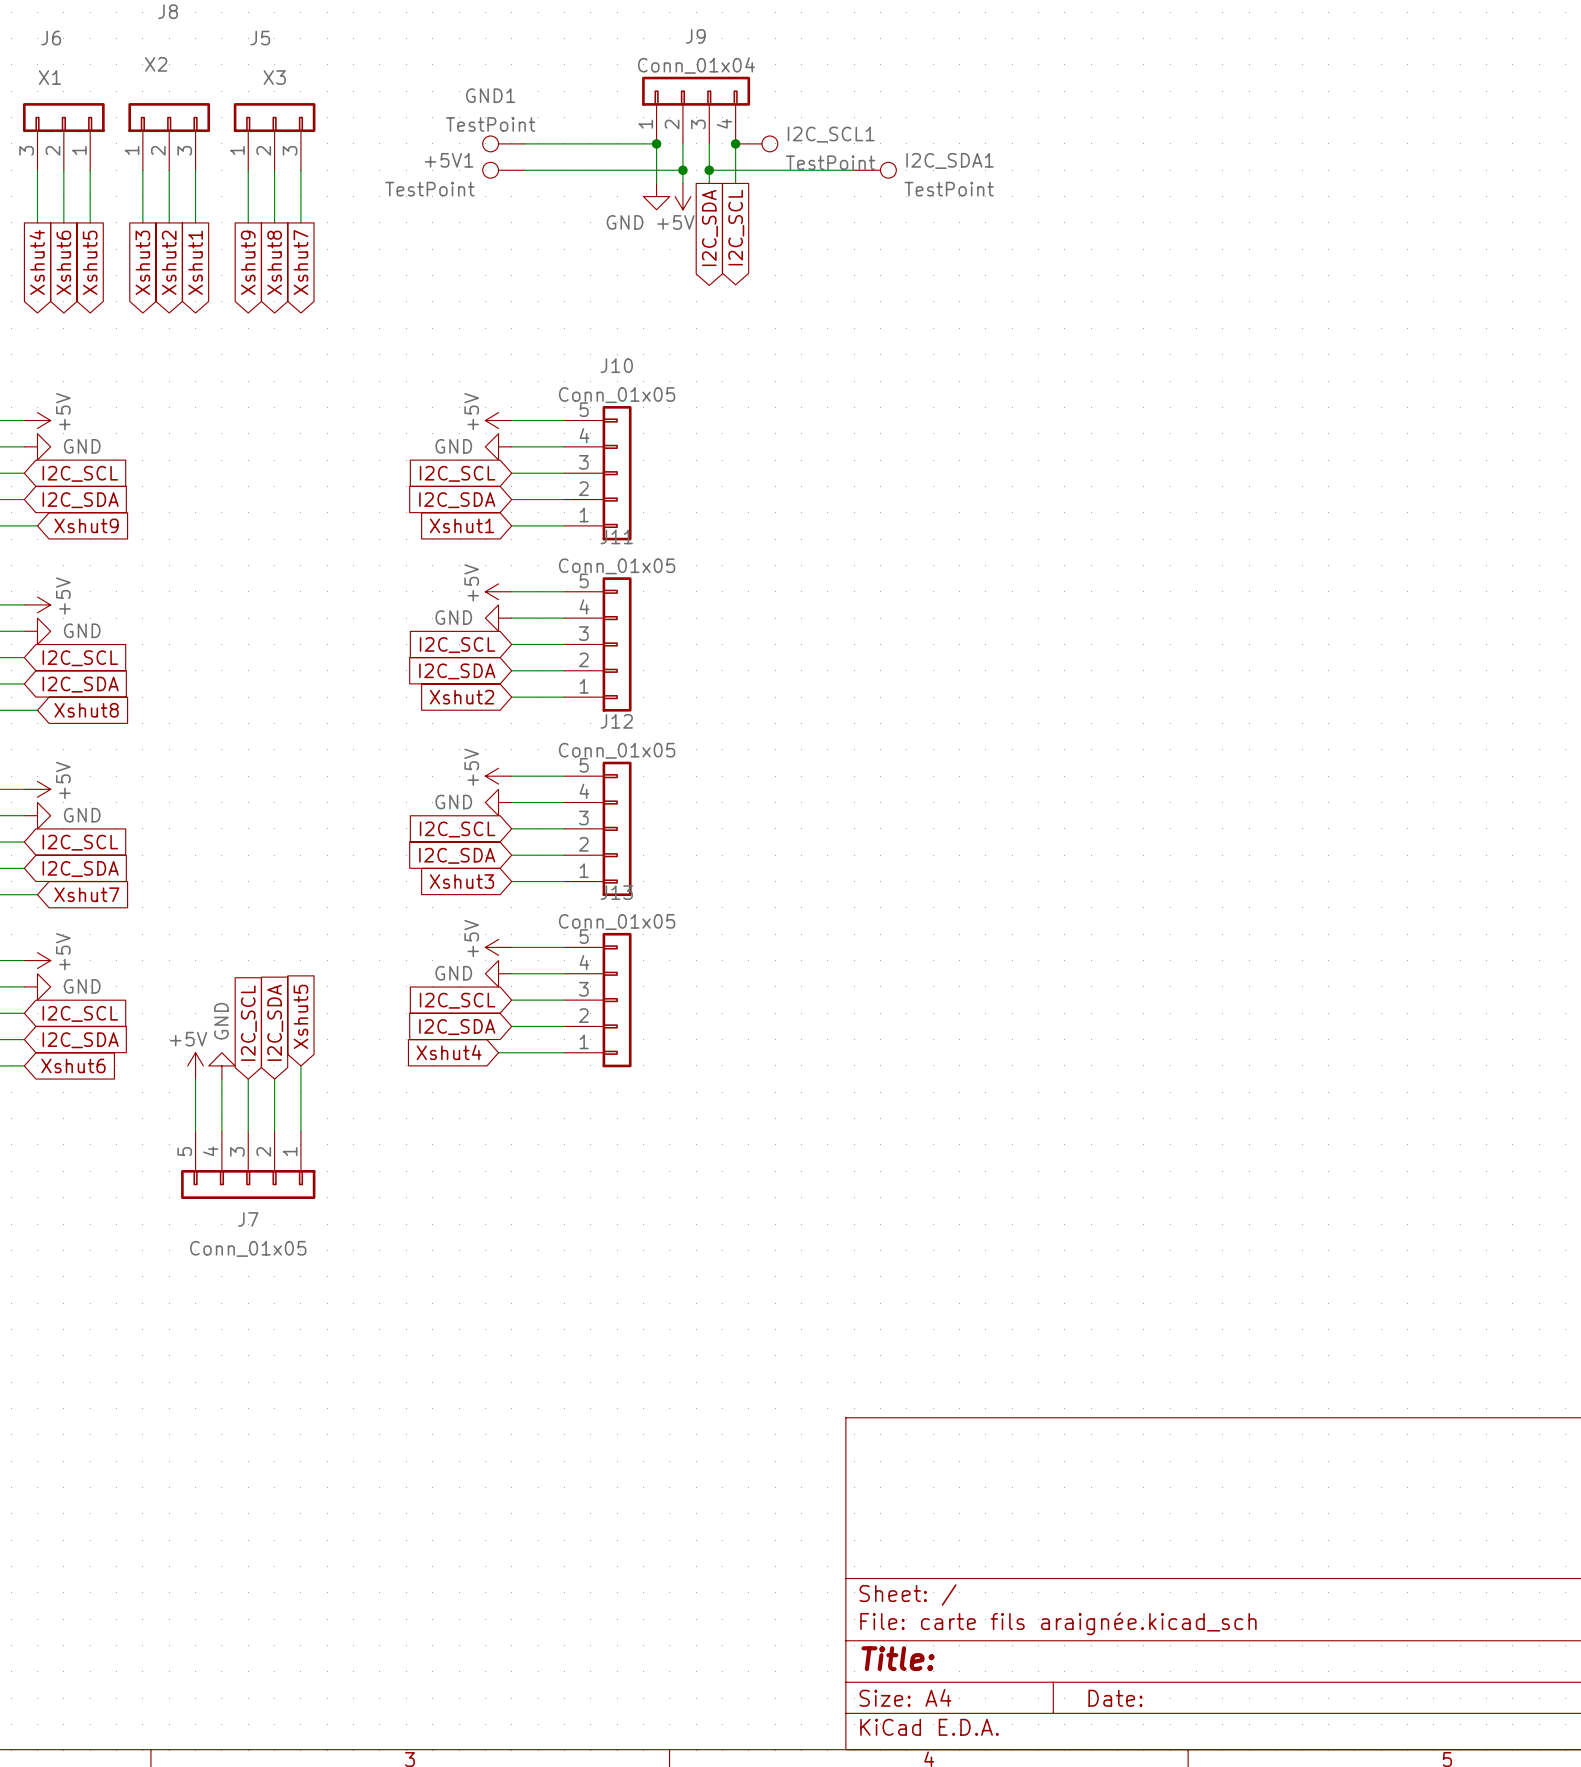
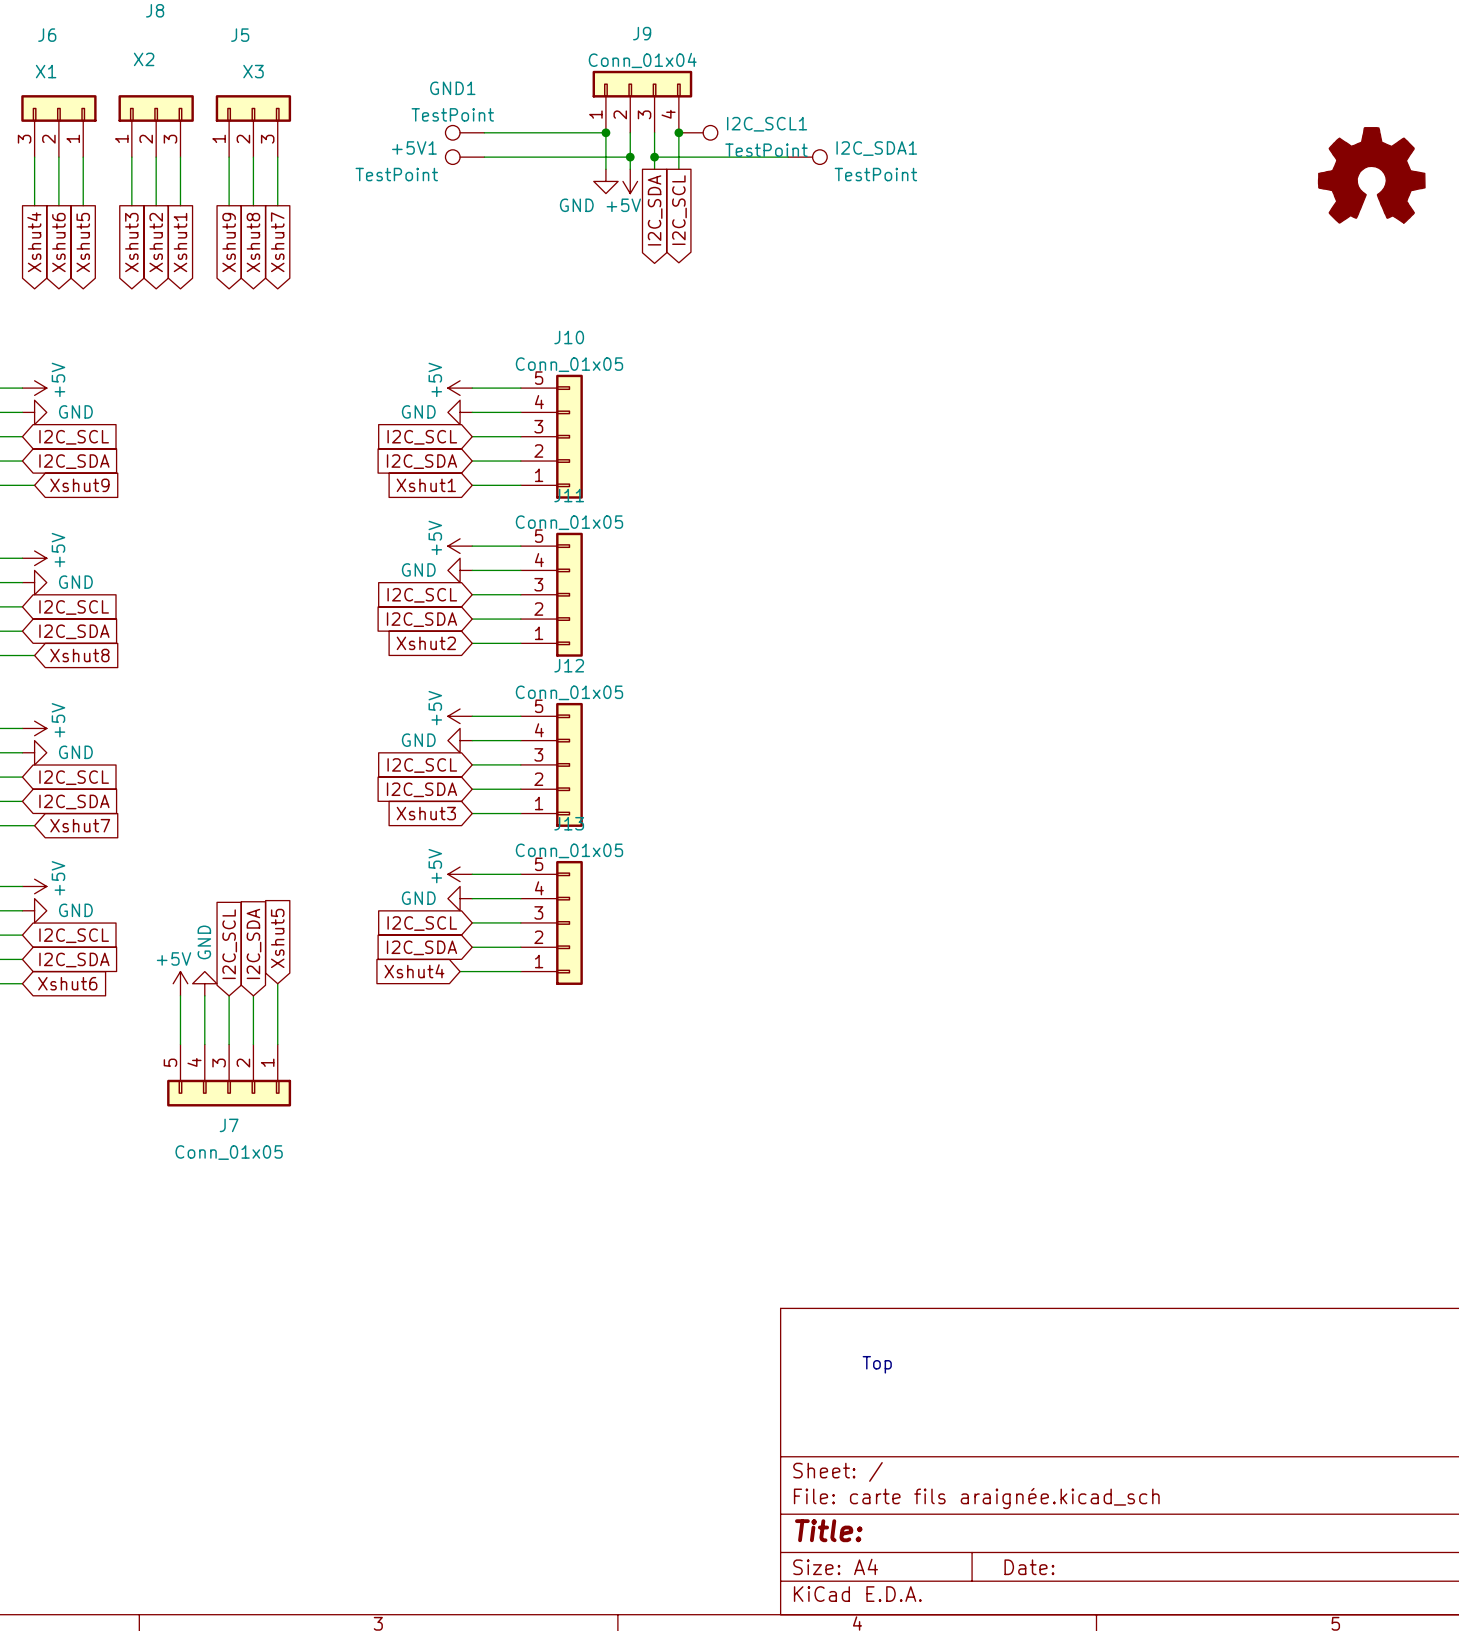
power symbol: none -> (1371, 175)
text: none -> Top (877, 1364)

